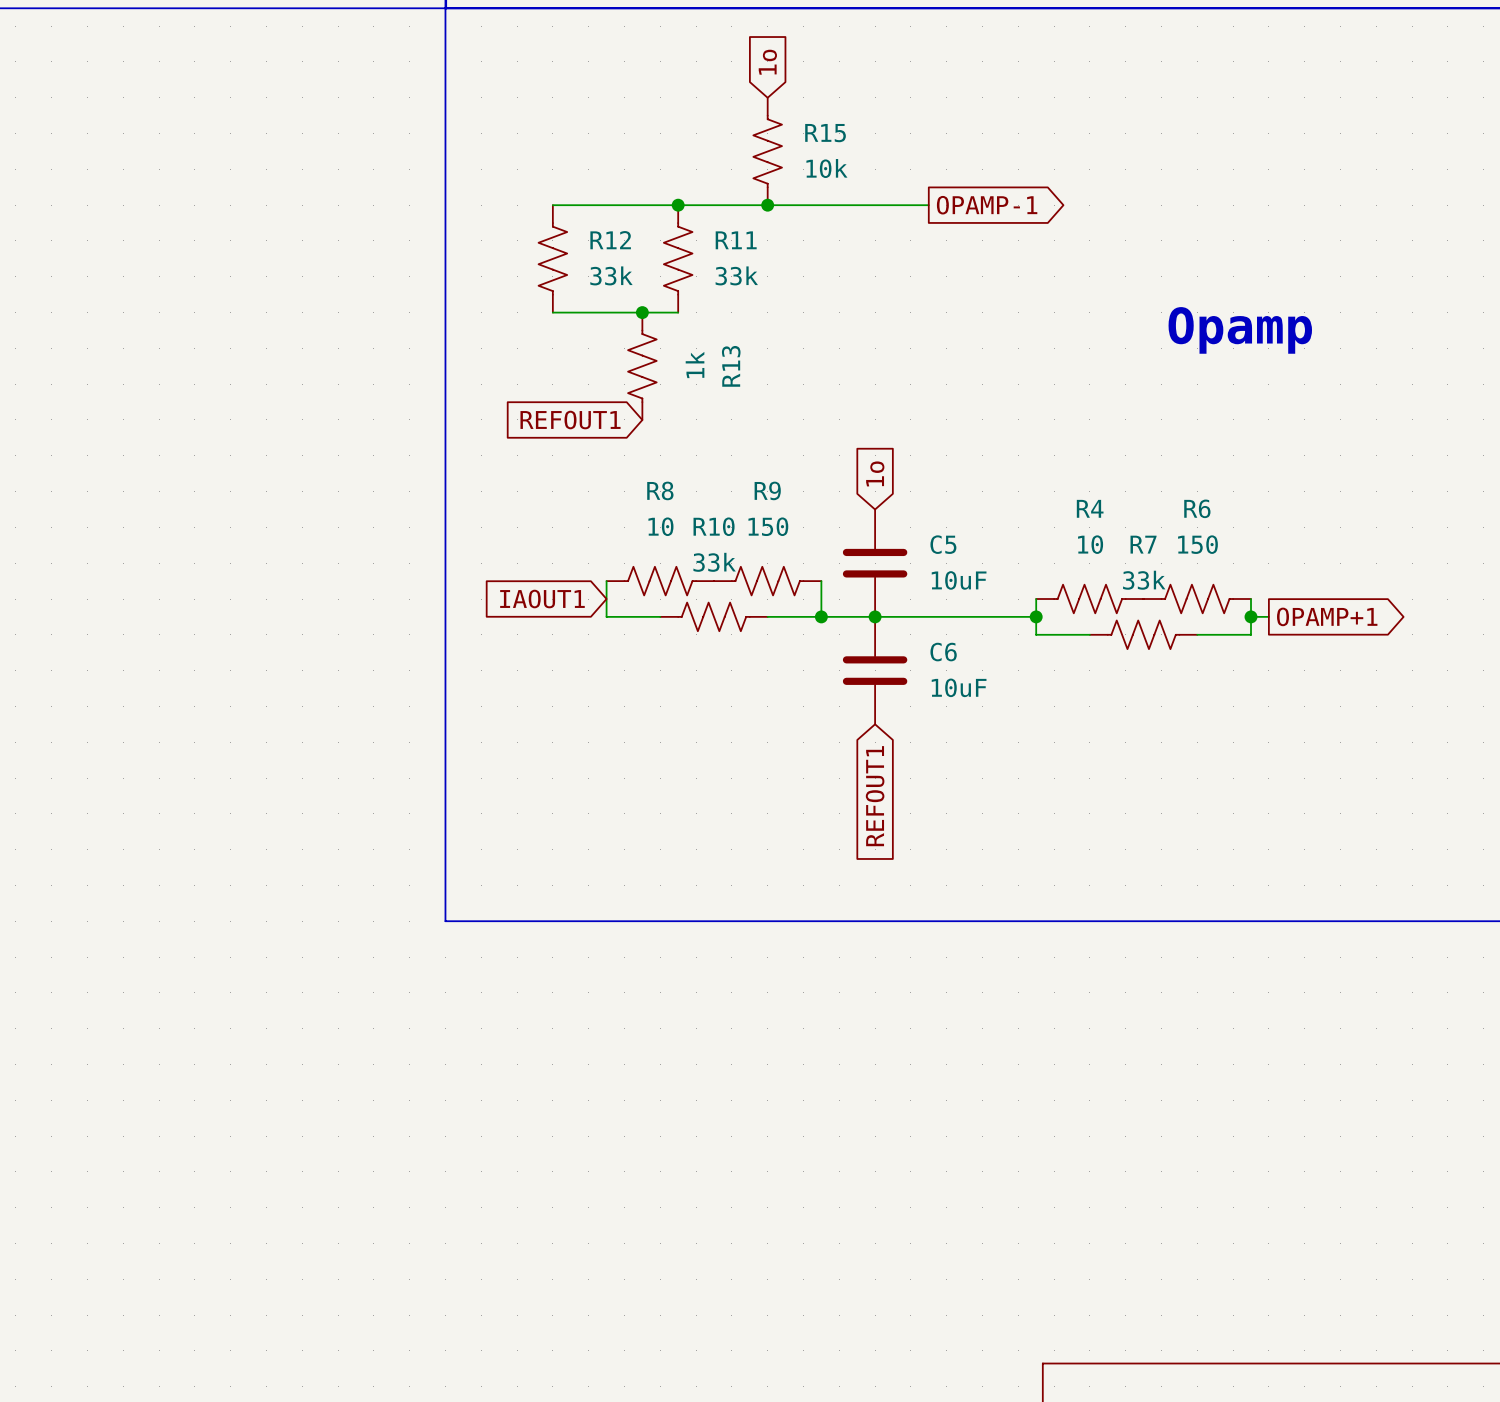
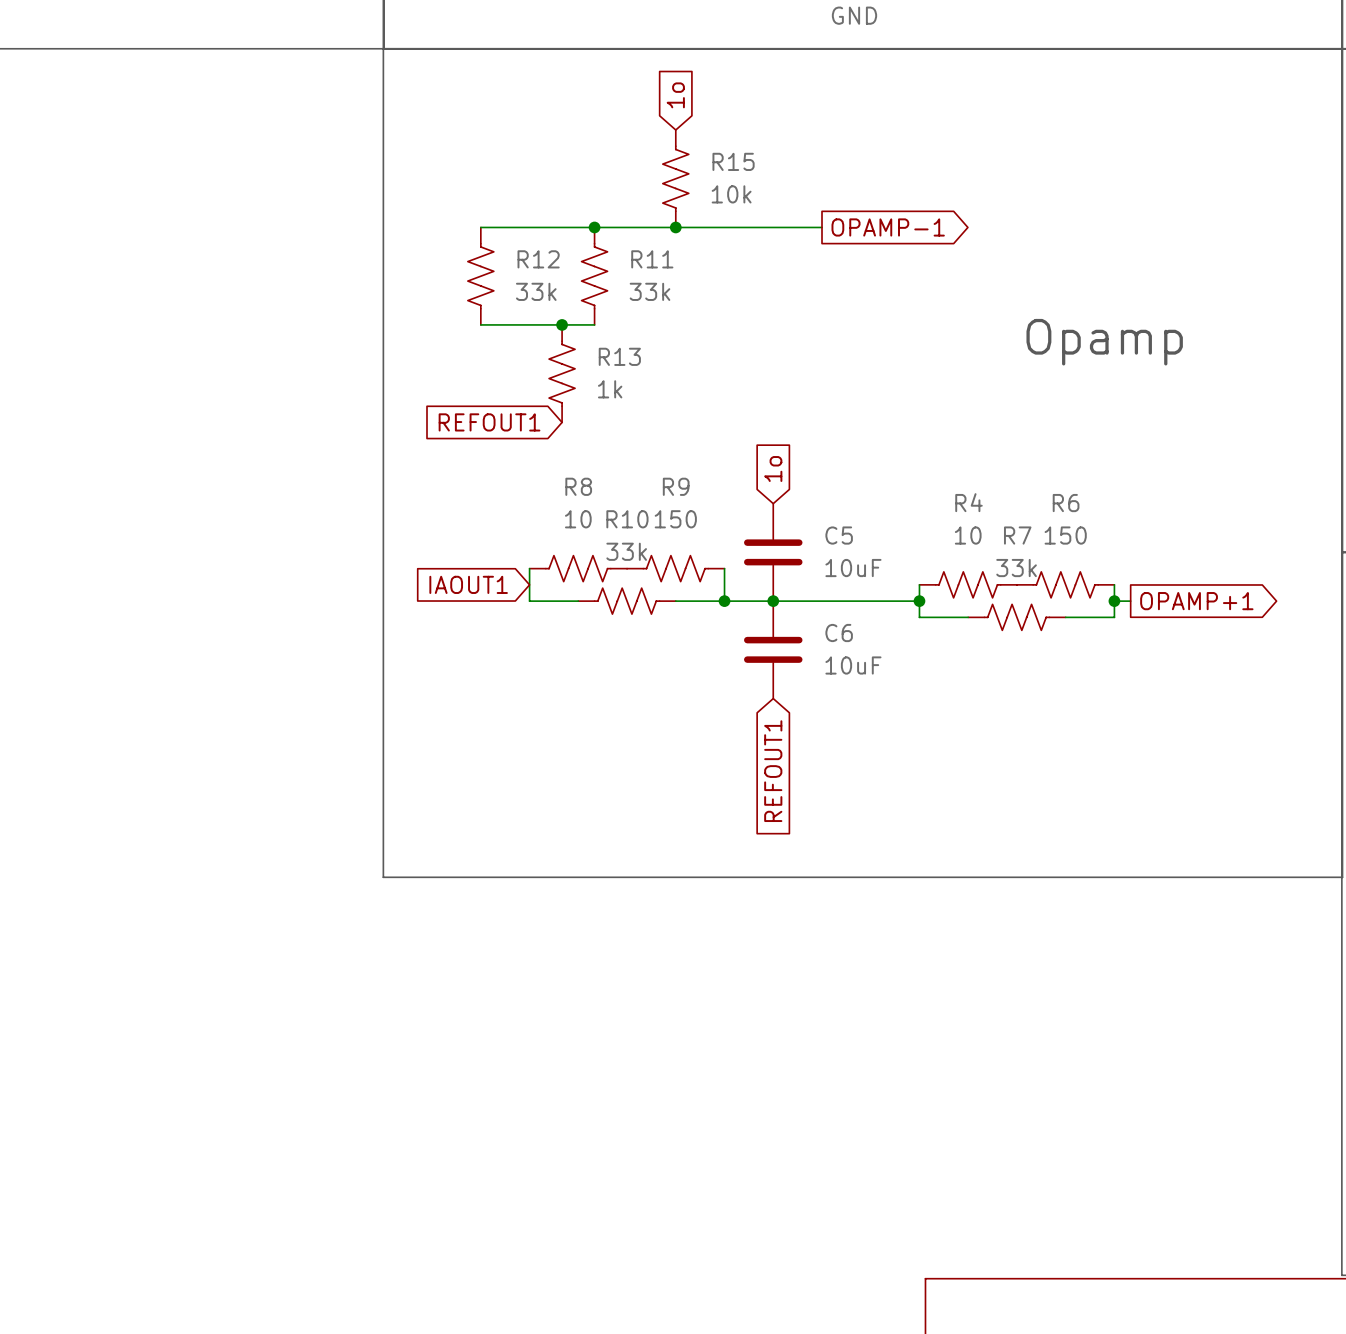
R13 value rotation: 0° (695, 365) -> 90° clockwise (610, 389)
R13 name rotation: 0° (731, 366) -> 90° clockwise (619, 356)

